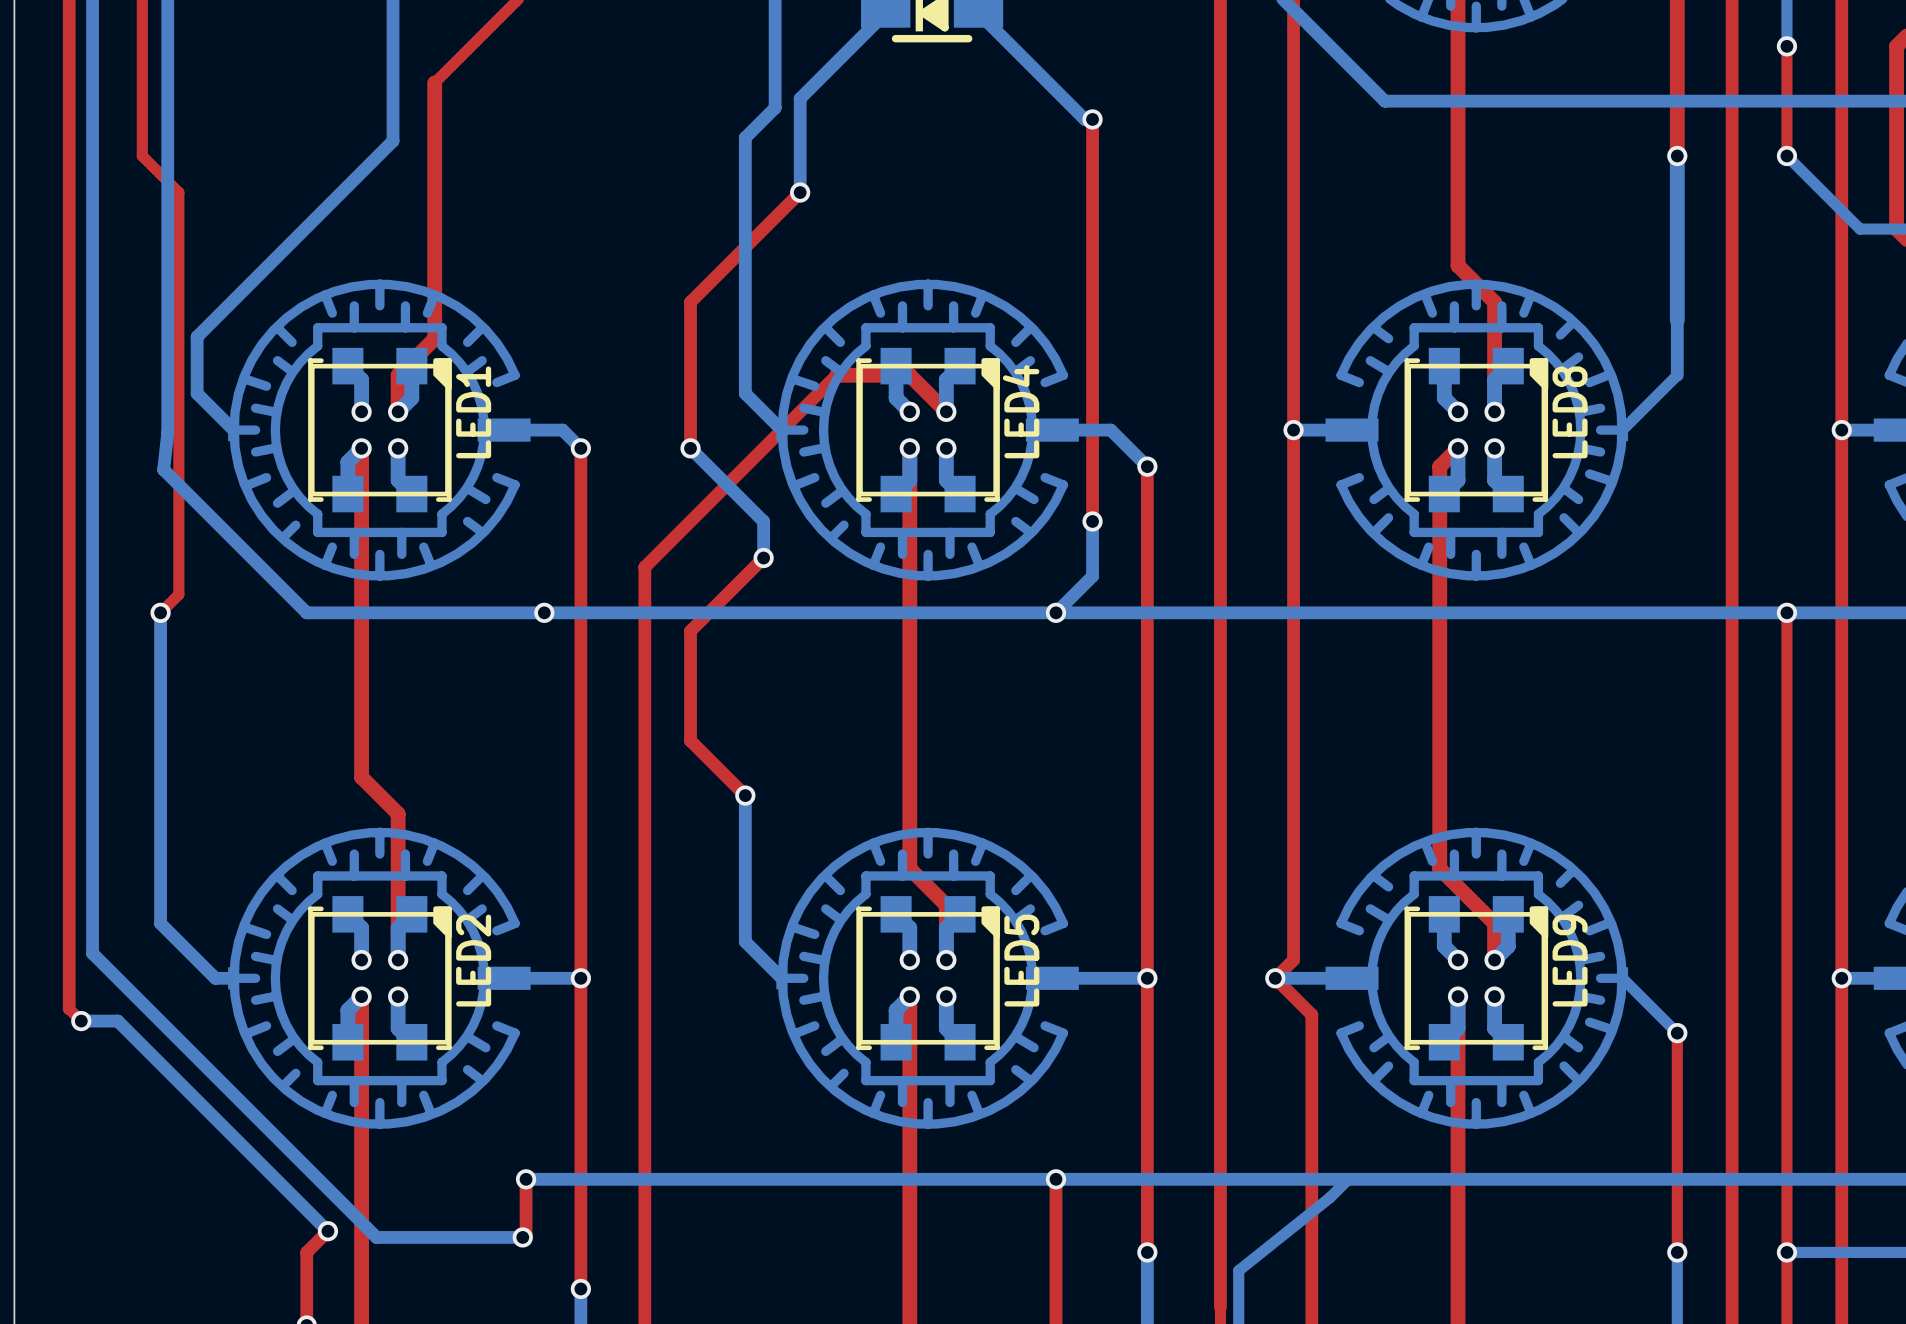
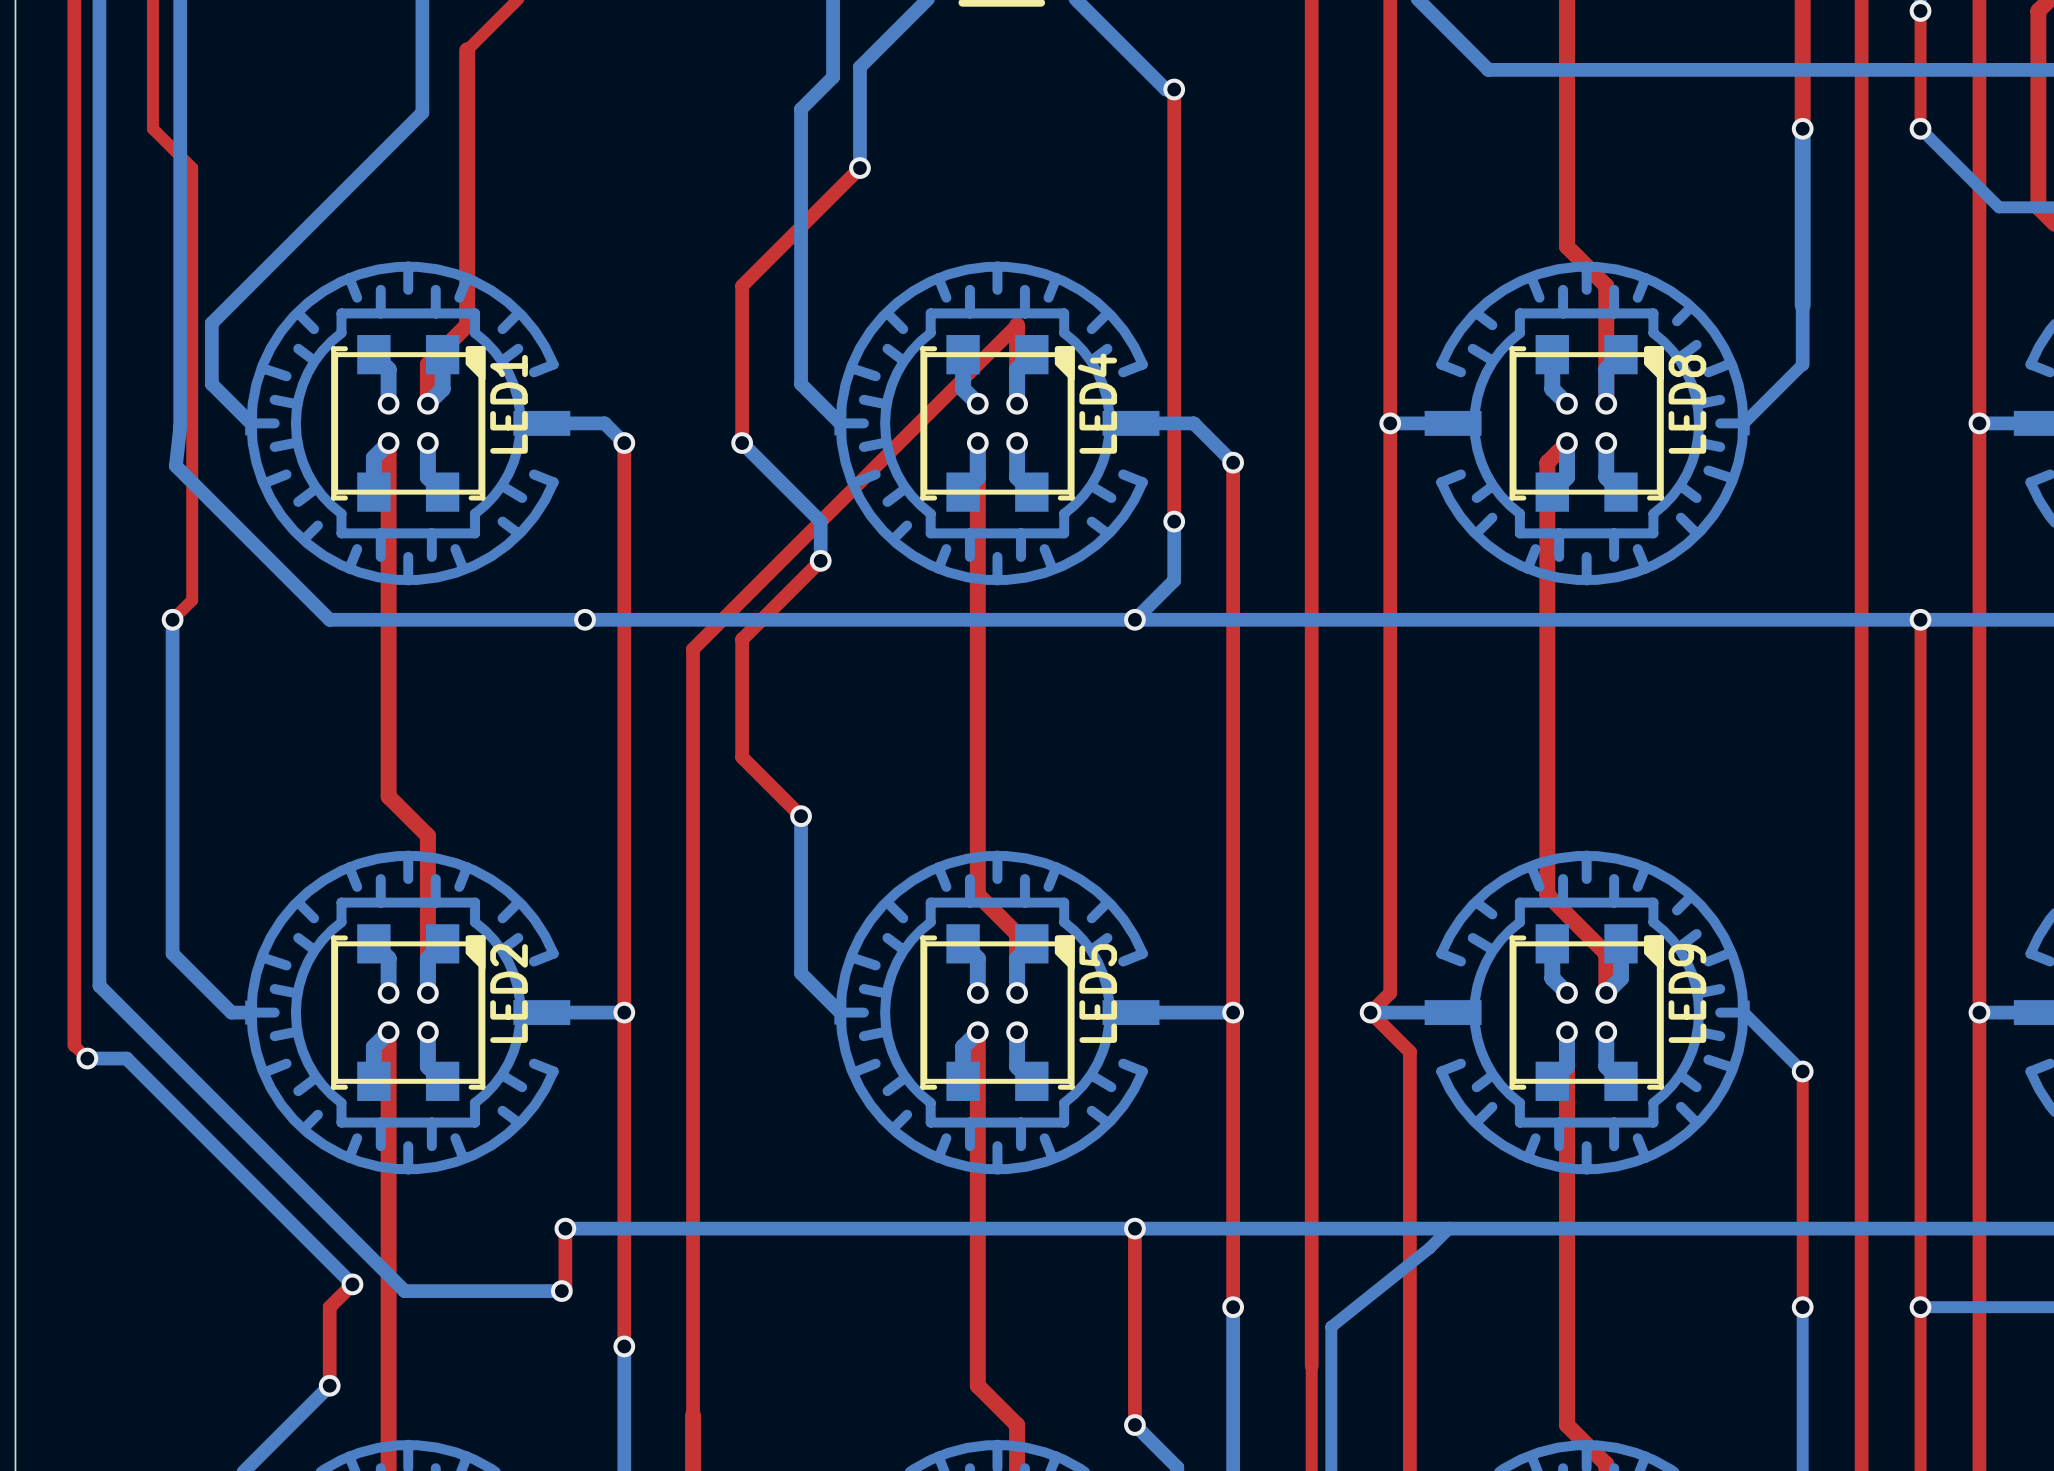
top track: (946, 411) (909, 375) (836, 375) (644, 567) (644, 640) -> (1017, 403) (1017, 325) (693, 649)

